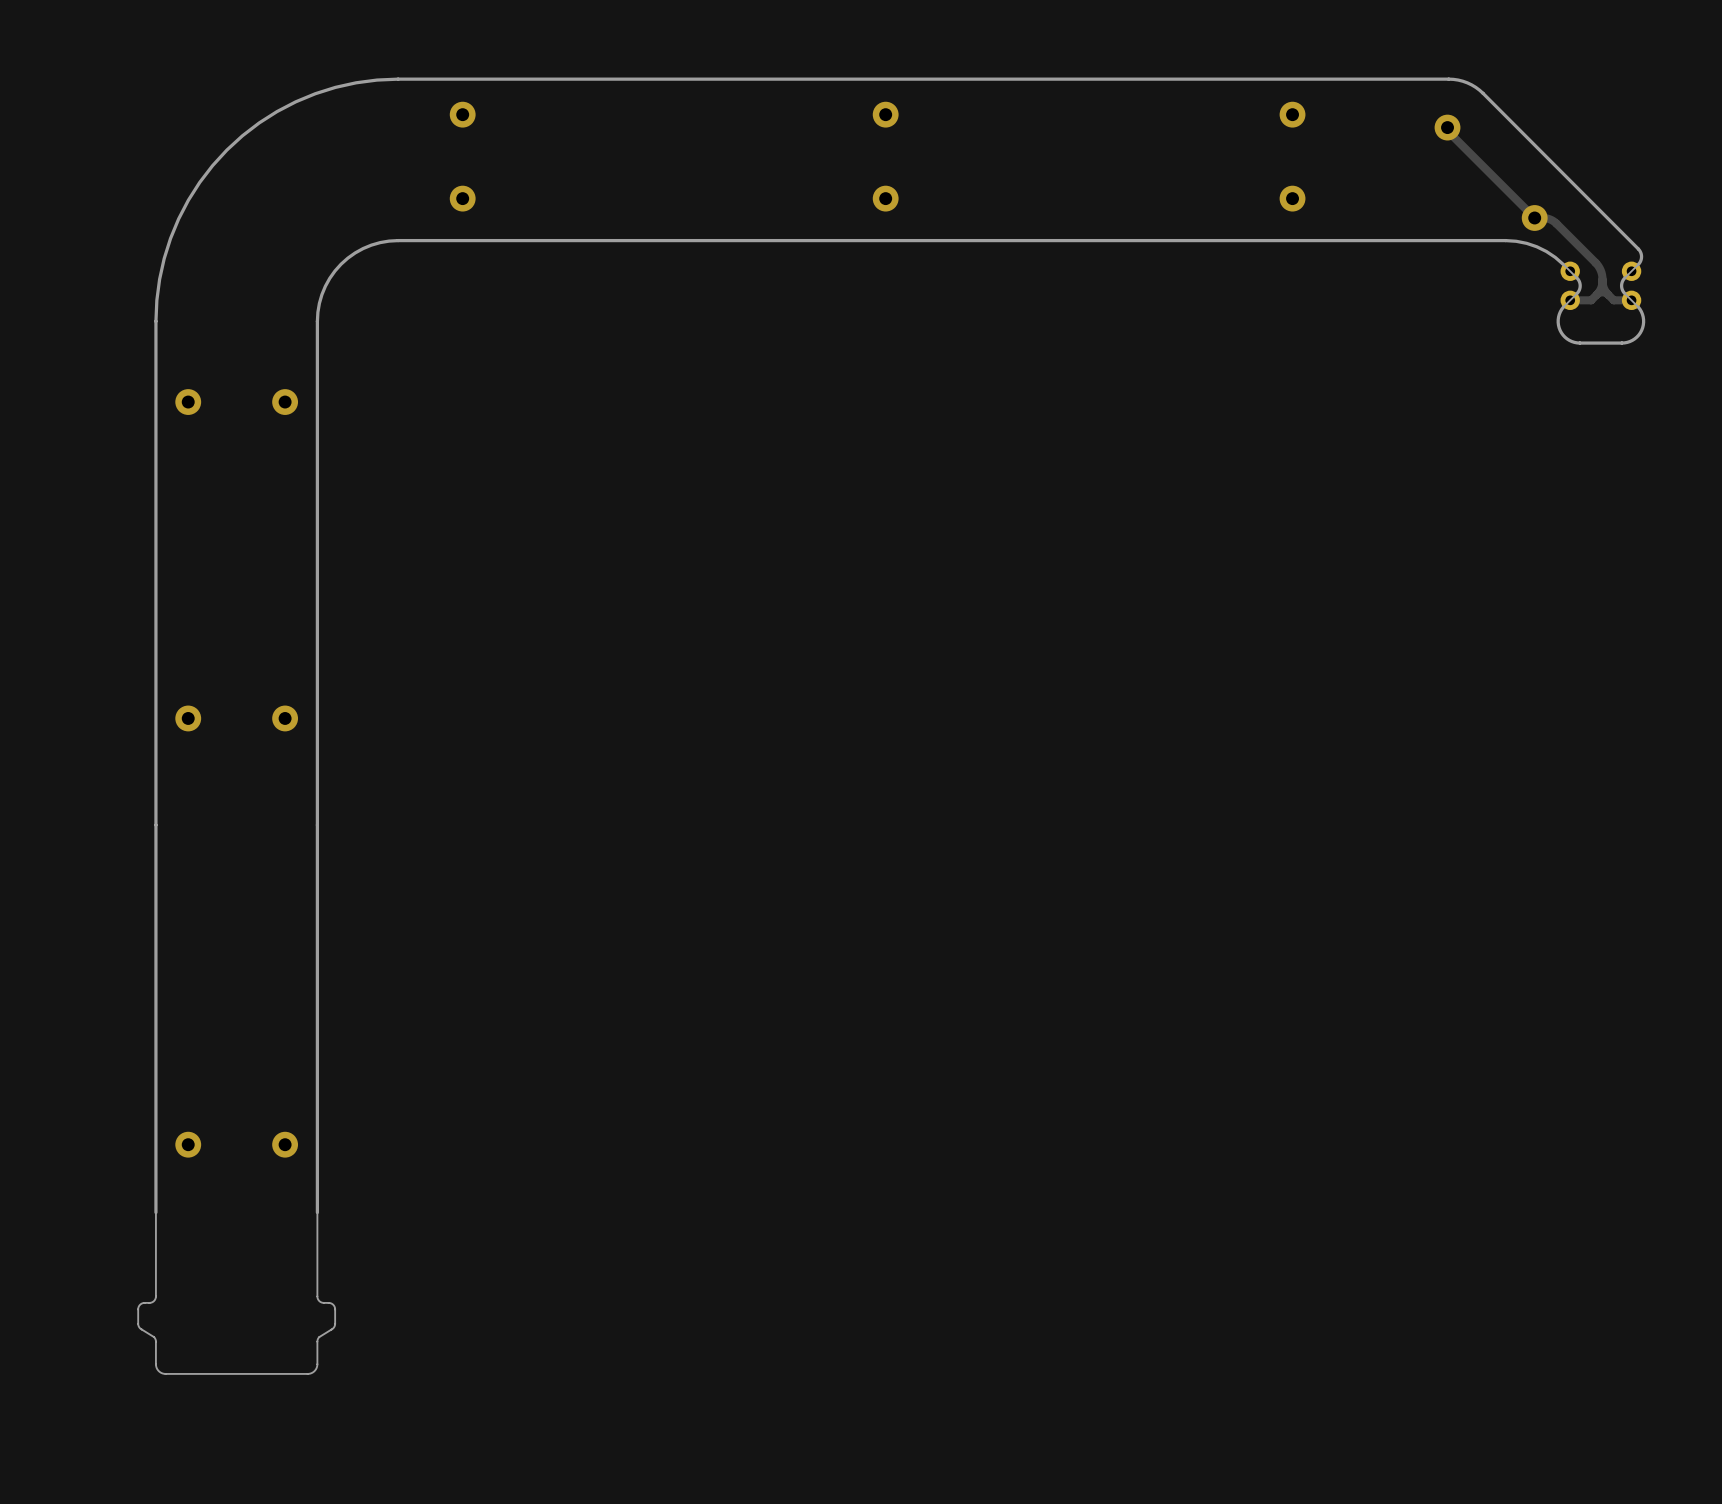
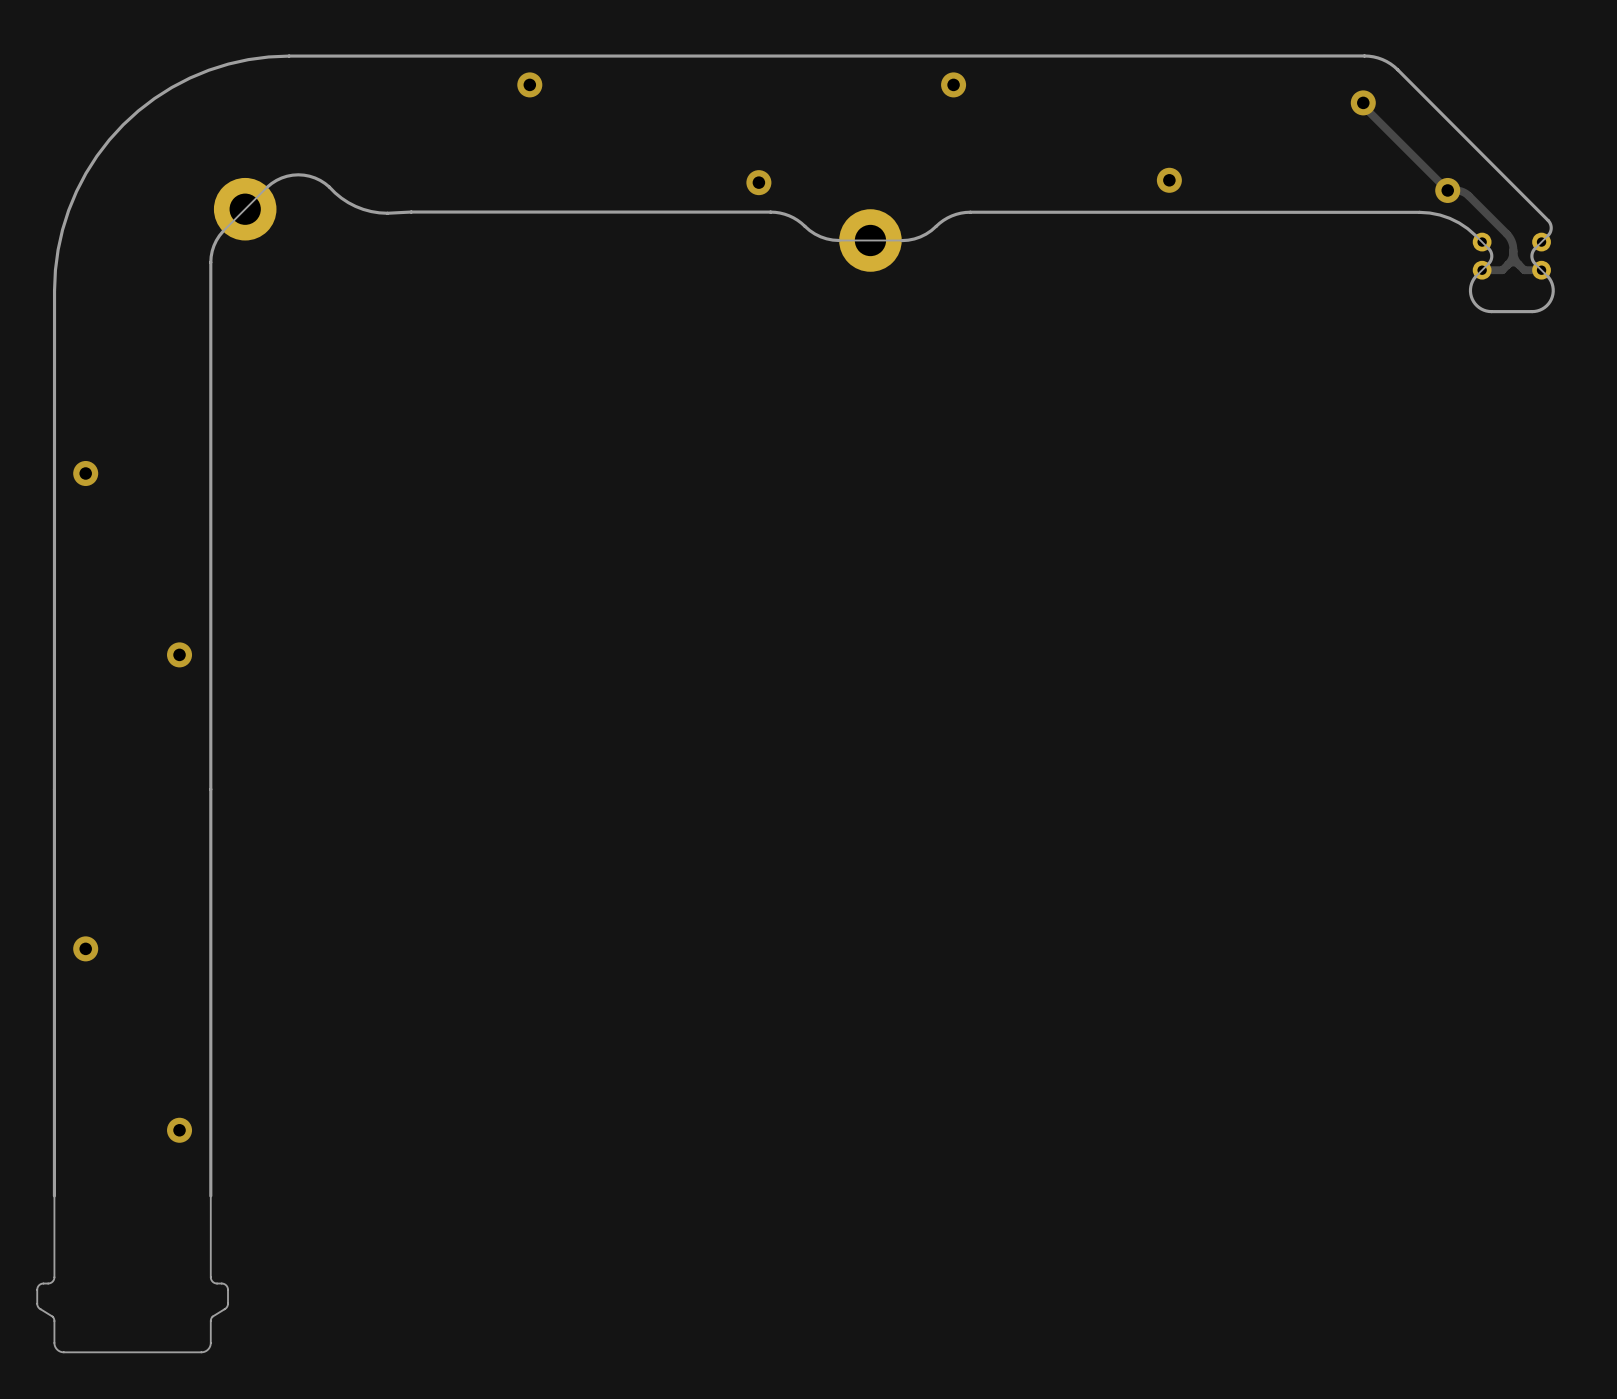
board edge: (1448, 79) (377, 80) (335, 87) (295, 101) (259, 122) (242, 135) (212, 165) (199, 182) (178, 218) (164, 258) (156, 300) (155, 1212) -> (1364, 55) (268, 56) (248, 59) (208, 70) (171, 87) (138, 110) (109, 139) (85, 173) (68, 210) (58, 249) (55, 270) (54, 1195)
via: none -> (529, 84)
via: none -> (953, 84)
via: (462, 114) -> none
via: (885, 114) -> none
via: (1292, 114) -> none
via: (462, 198) -> none
via: (885, 198) -> none
via position: (1292, 198) -> (1169, 180)
via: none -> (758, 182)
board edge: none -> (267, 187) (287, 176) (309, 176) (325, 183) (341, 198) (355, 206) (371, 211) (387, 213) (775, 212) (793, 217) (820, 236) (839, 240)
part: none -> (245, 209)
board edge: (1505, 240) (398, 240) (371, 245) (347, 258) (335, 270) (325, 286) (319, 303) (317, 321) (317, 1212) -> (1419, 212) (965, 212) (947, 217) (920, 236) (901, 240)
board edge: none -> (223, 231) (213, 245) (210, 262) (210, 1195)
part: none -> (870, 240)
via: (188, 402) -> none
via: (285, 402) -> none
via: none -> (85, 473)
via: none -> (179, 654)
via: (188, 718) -> none
via: (285, 718) -> none
via: none -> (85, 948)
via: (188, 1144) -> none
via: (285, 1144) -> none
via: none -> (179, 1130)
part position: (236, 1293) -> (132, 1274)

